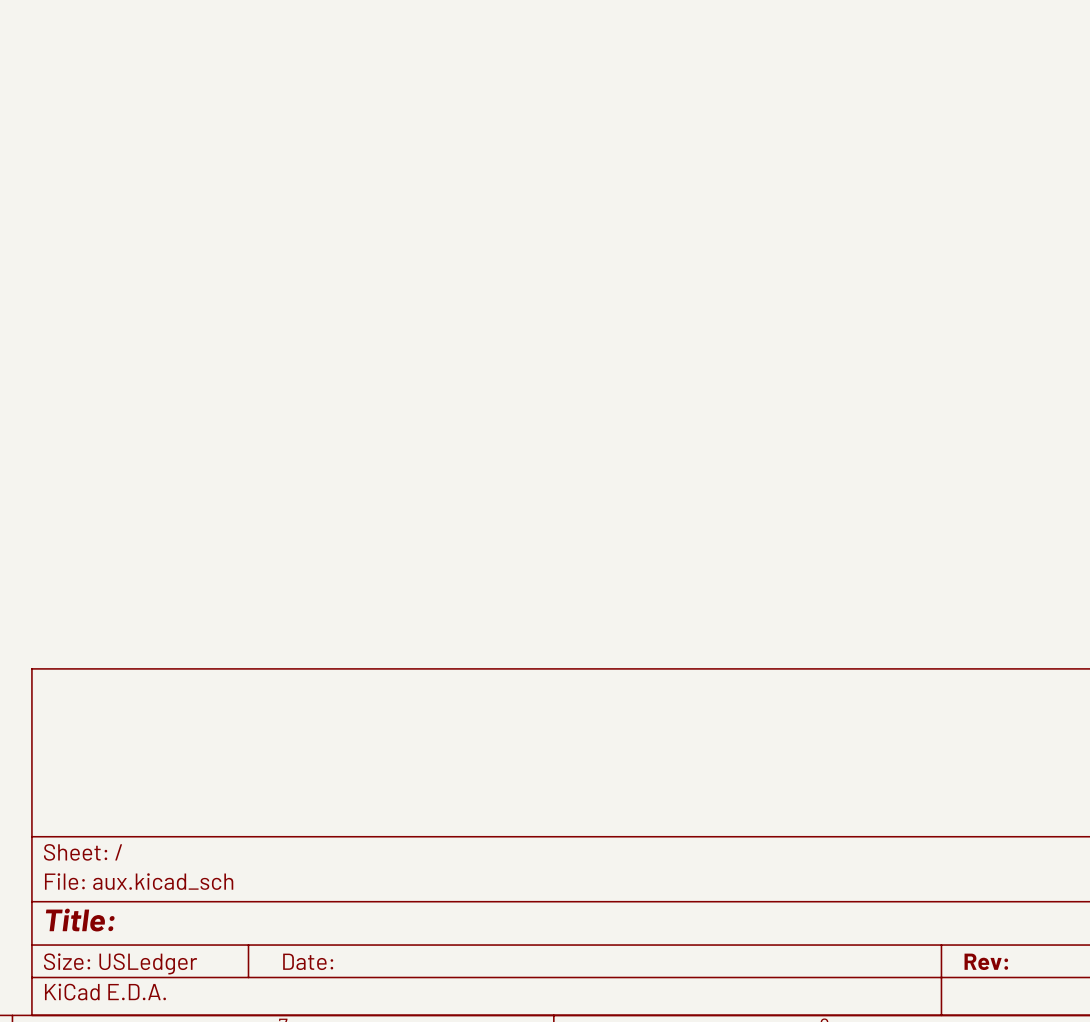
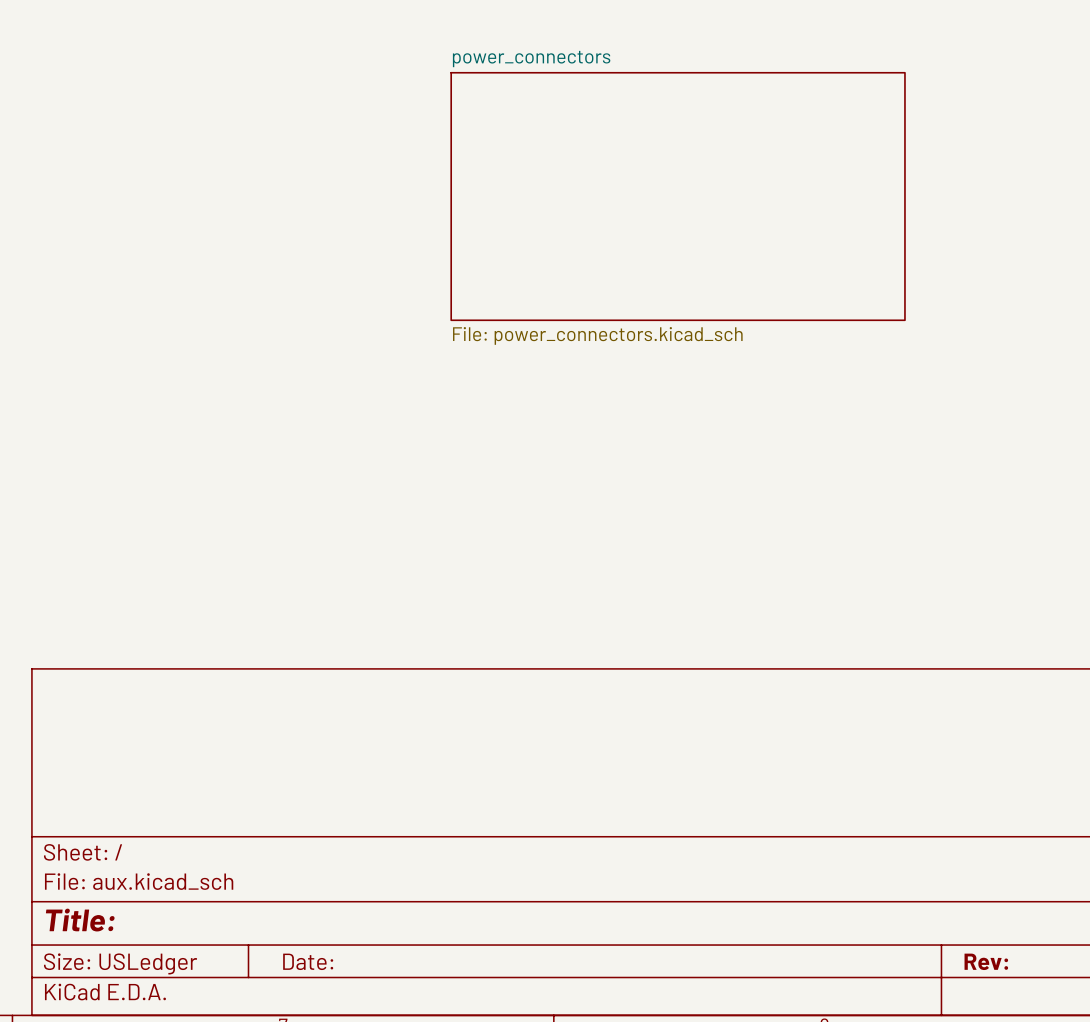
sheet power_connectors: none -> File: power_connectors.kicad_sch (678, 196)

